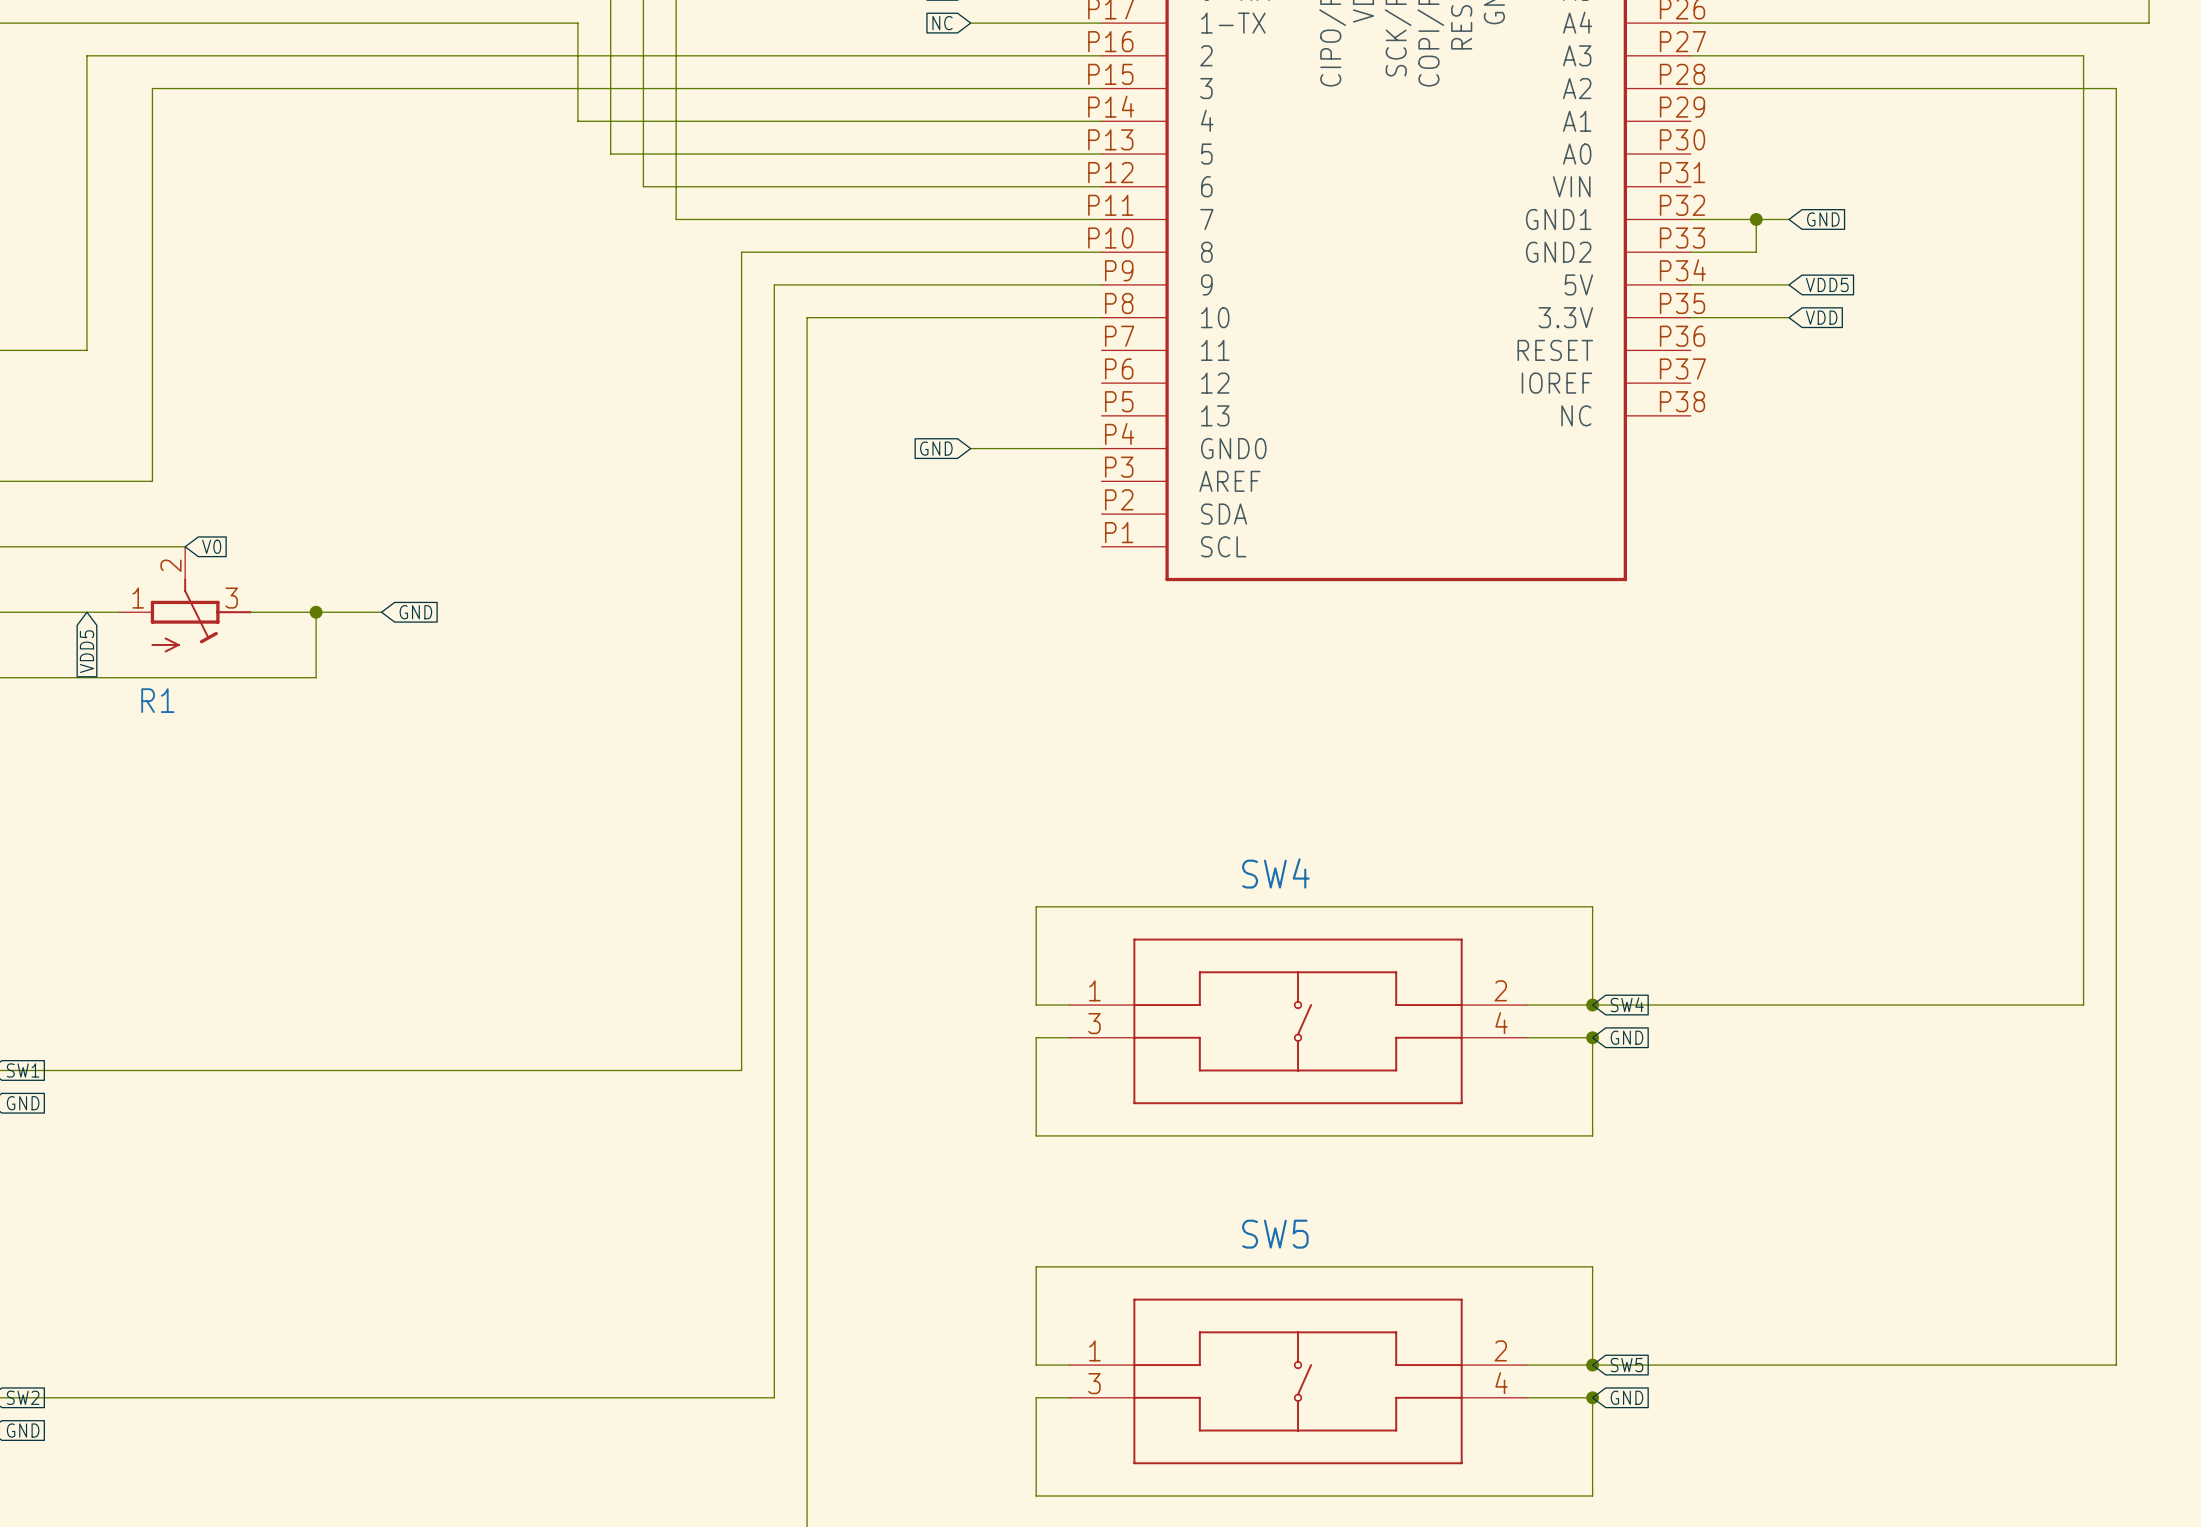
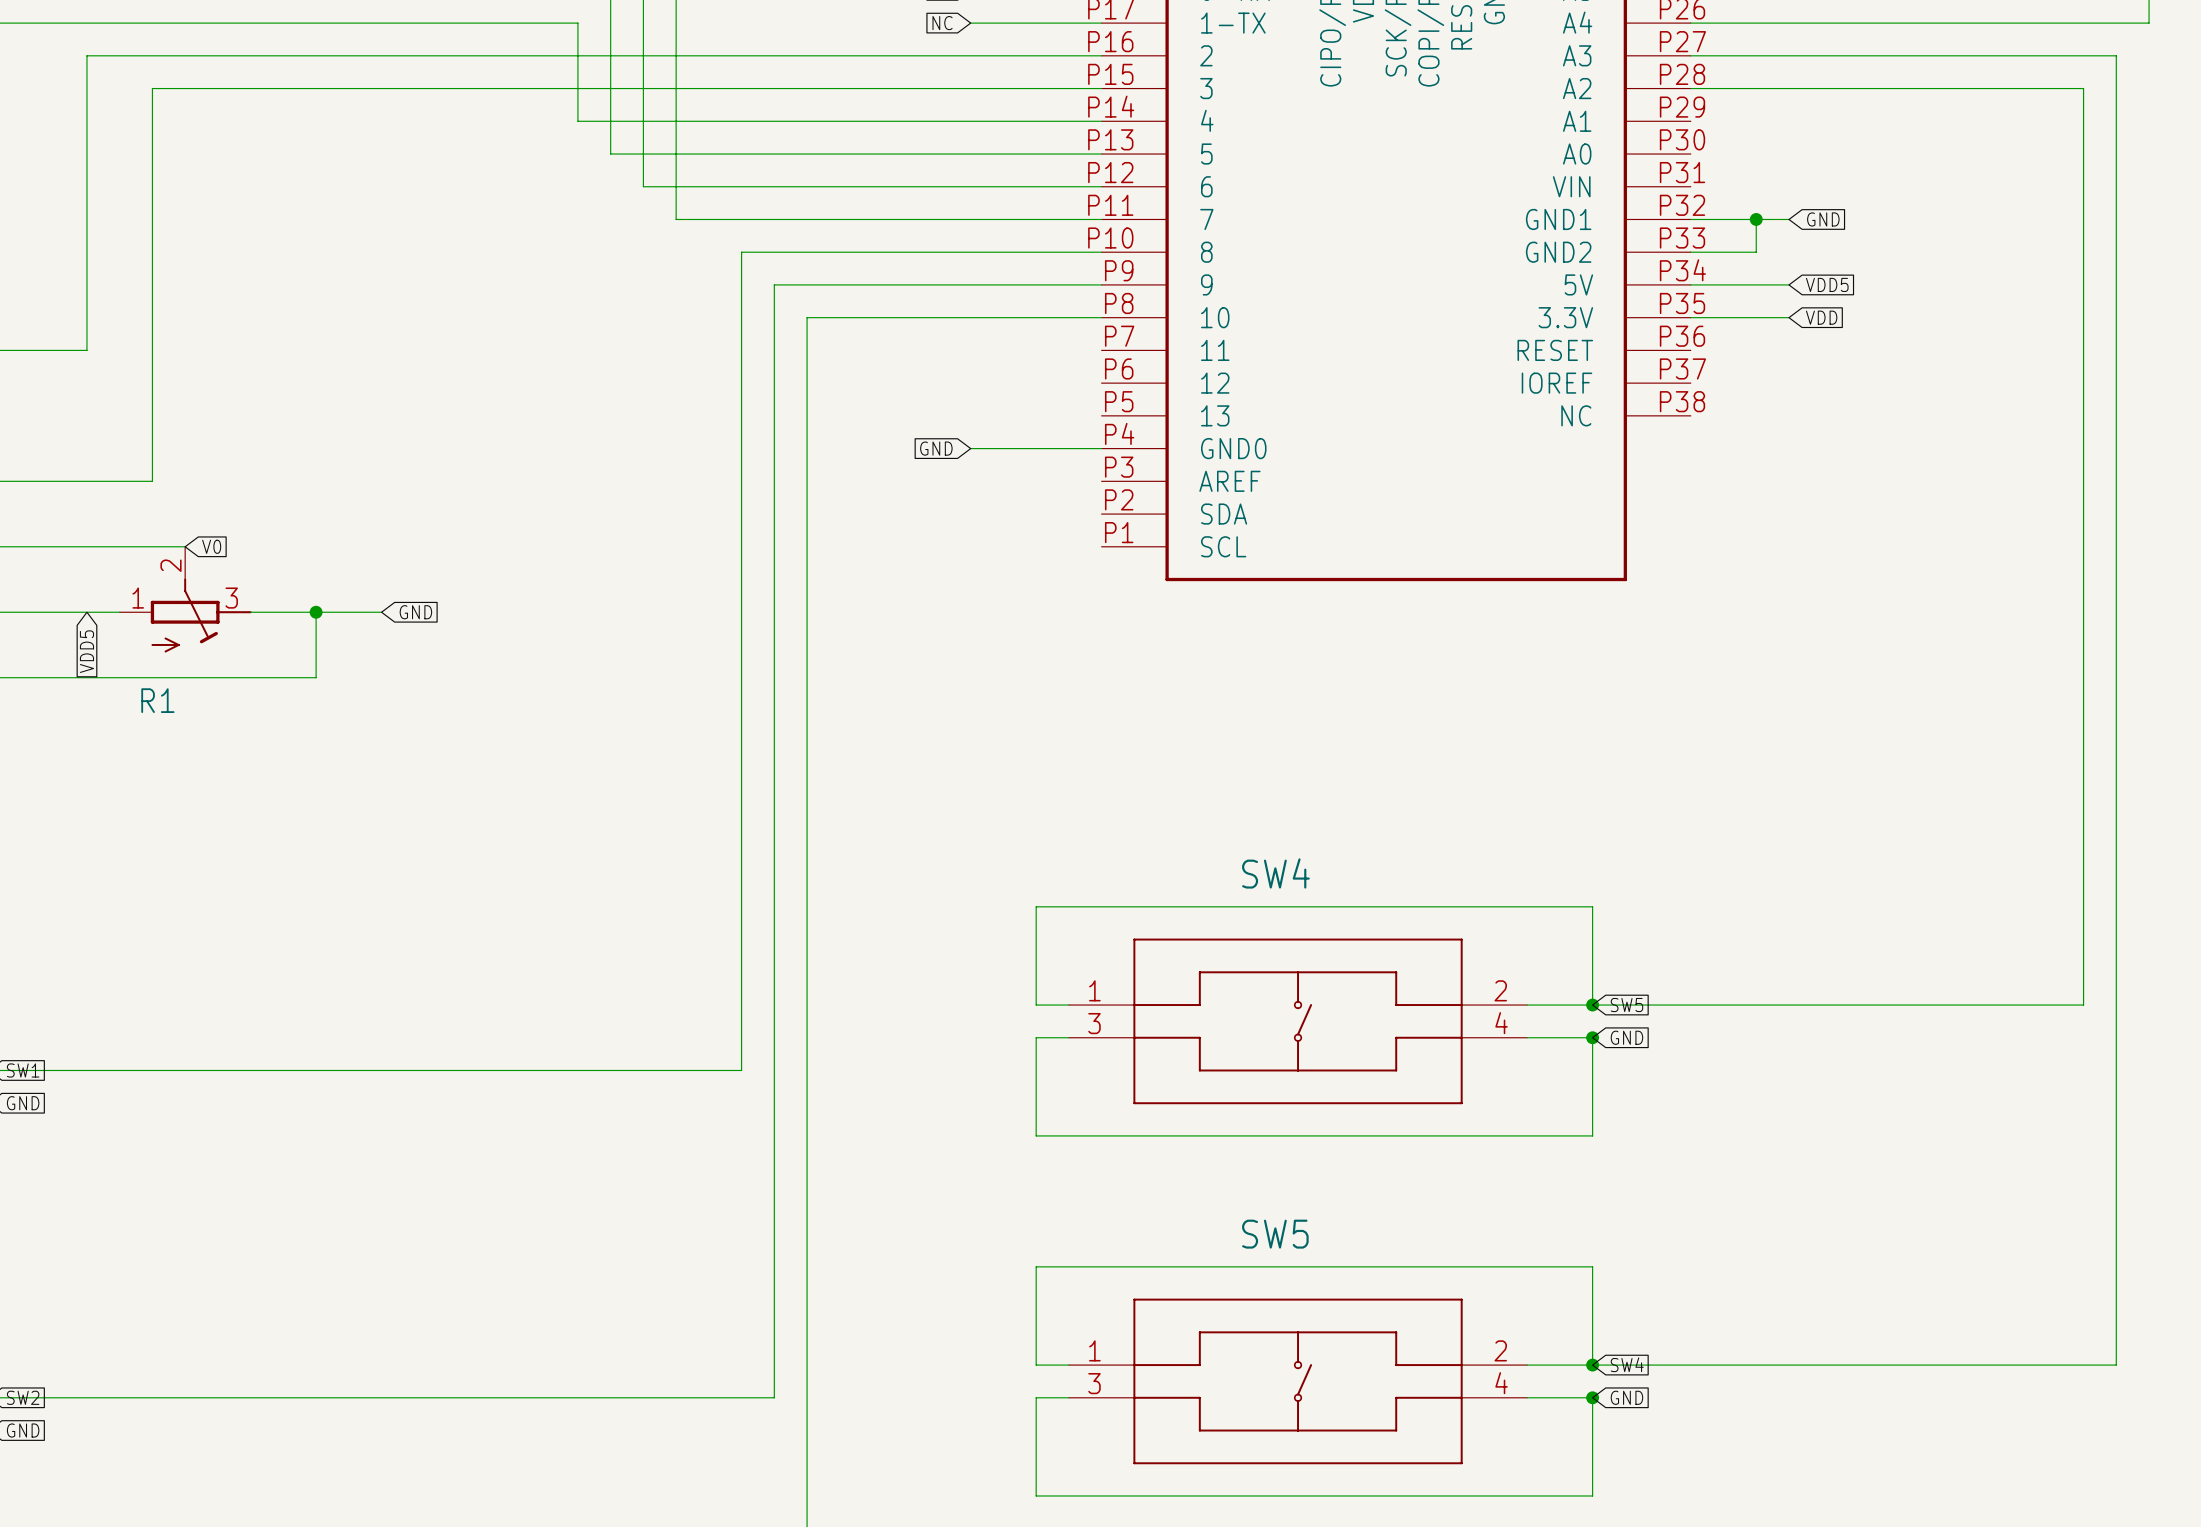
wire: (2083, 55) (2083, 88) (2116, 88) -> (2083, 55) (2116, 55) (2116, 88)
global label: SW4 (1627, 1004) -> SW5 (1626, 1005)
global label: SW5 (1626, 1365) -> SW4 (1627, 1364)

